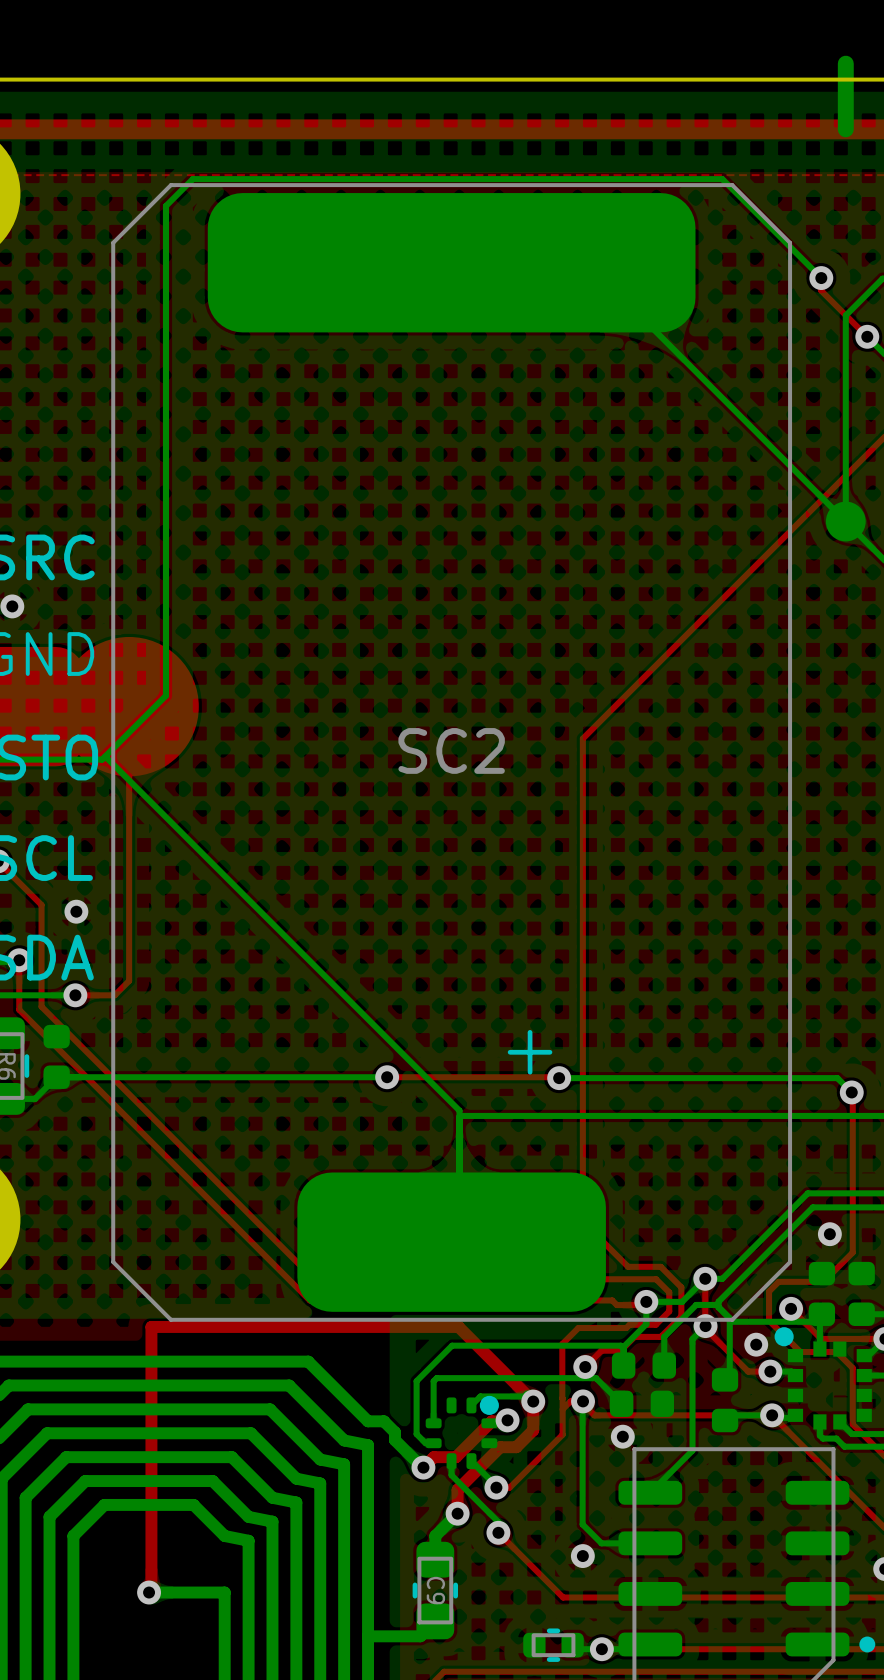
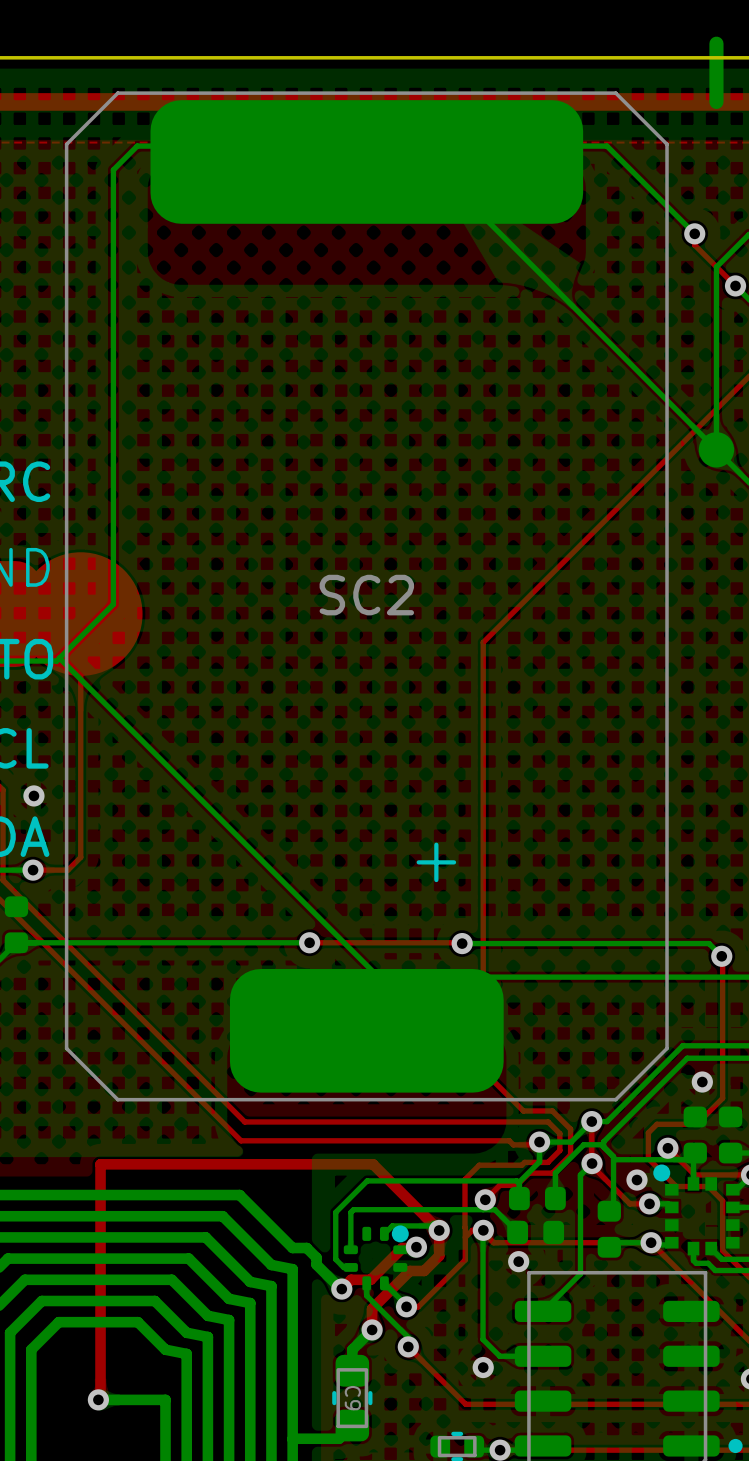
SC2 position: (451, 752) -> (366, 596)

